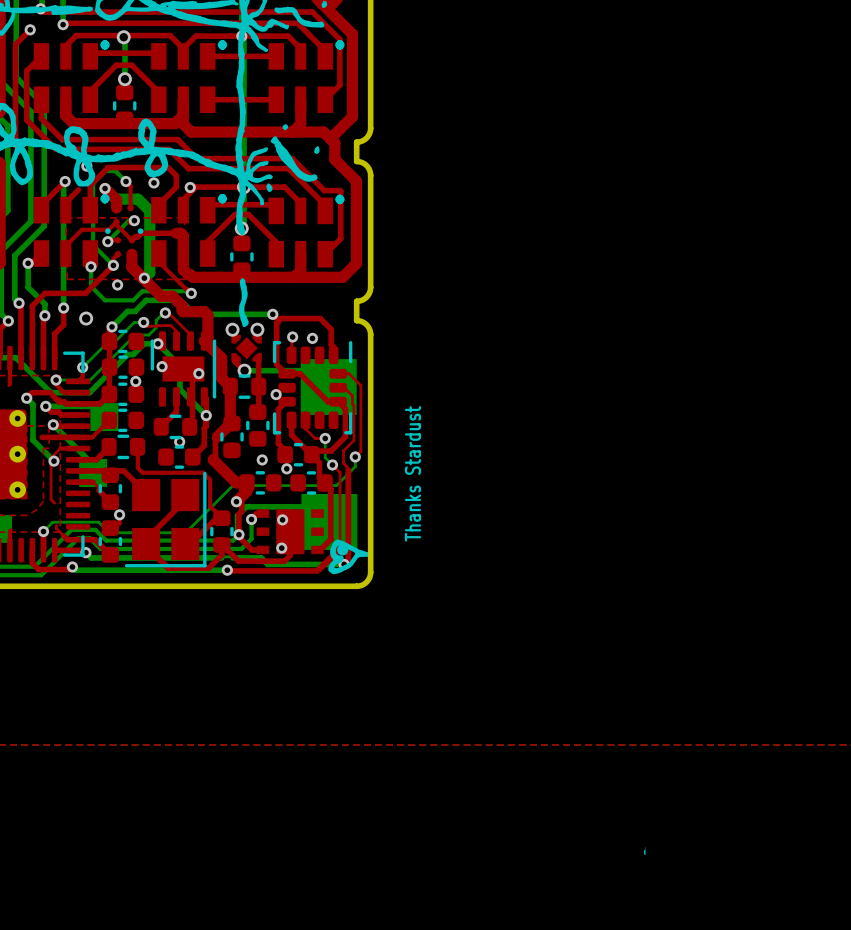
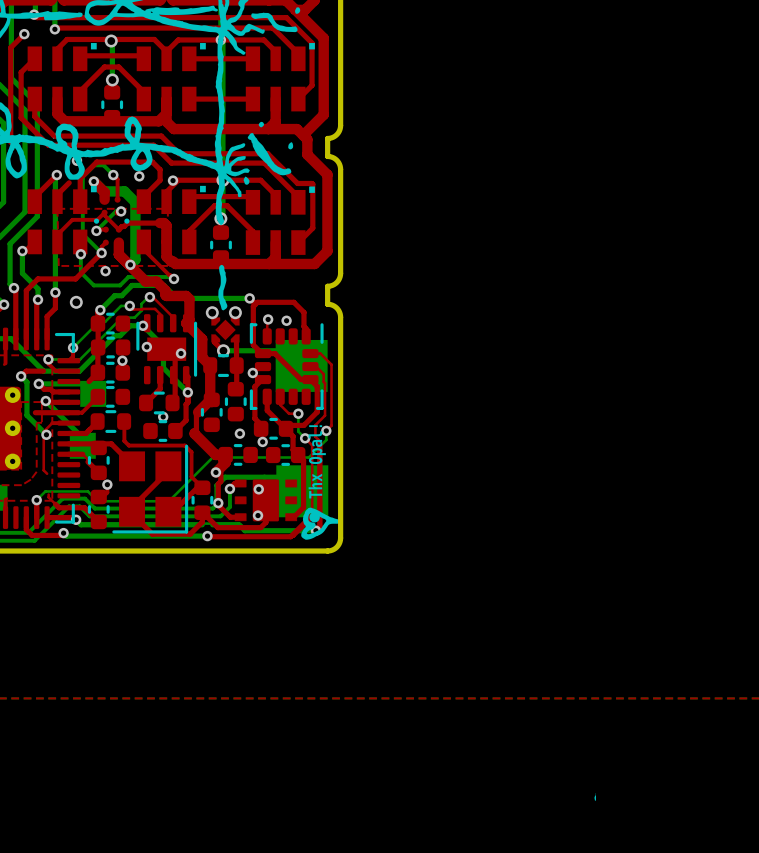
top track: (52, 395) (58, 401) (65, 403) (99, 403) -> none
text: Thanks Stardust (412, 473) -> none
text: none -> Thx Opal! (317, 461)

